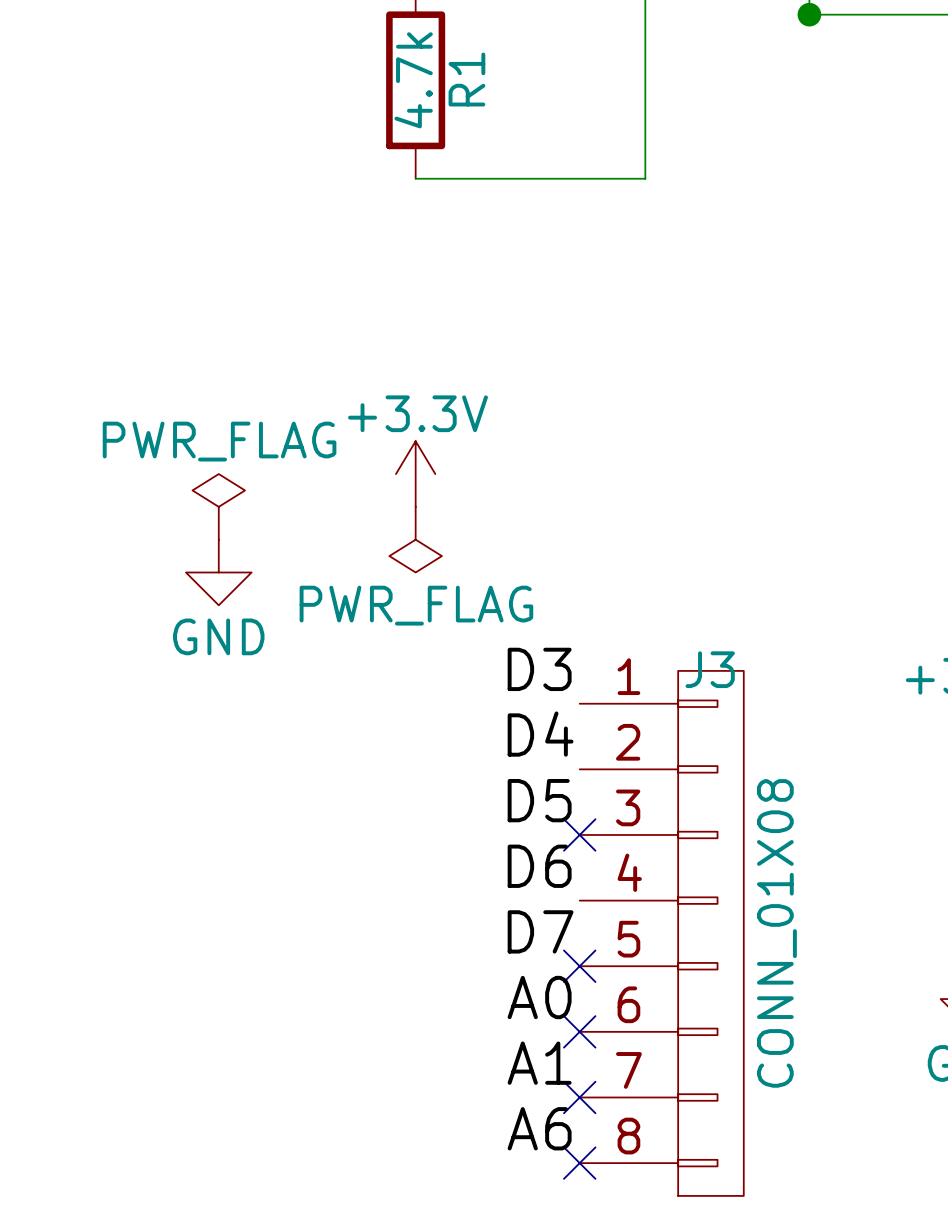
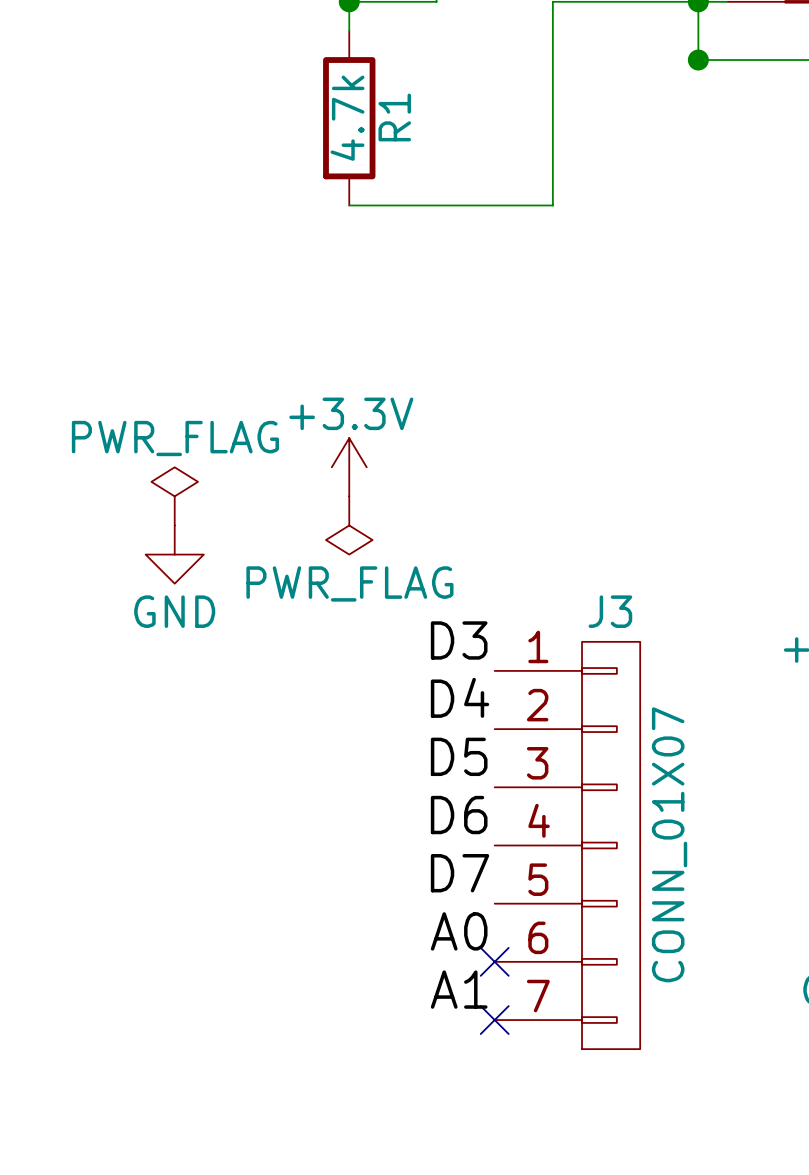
J3 symbol: [579, 670, 744, 1196] -> [494, 641, 641, 1050]
no-connect mark: (579, 834) -> none
J3 value: CONN_01X08 (776, 933) -> CONN_01X07 (669, 844)
no-connect mark: (579, 966) -> none
label: A6 (539, 1128) -> none
no-connect mark: (579, 1163) -> none

